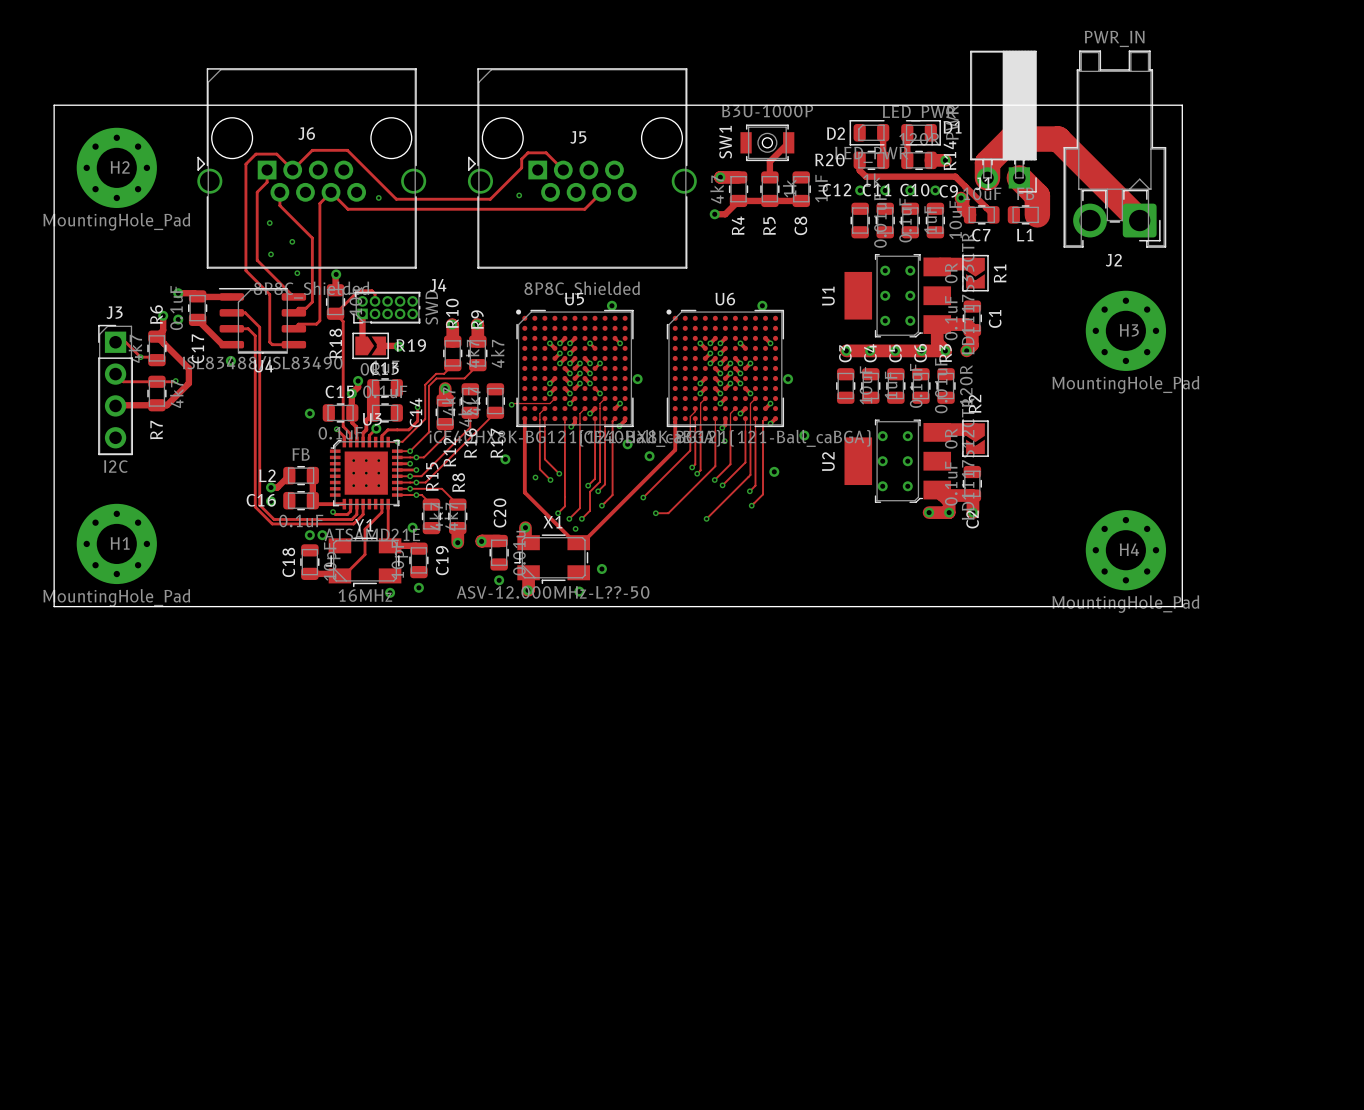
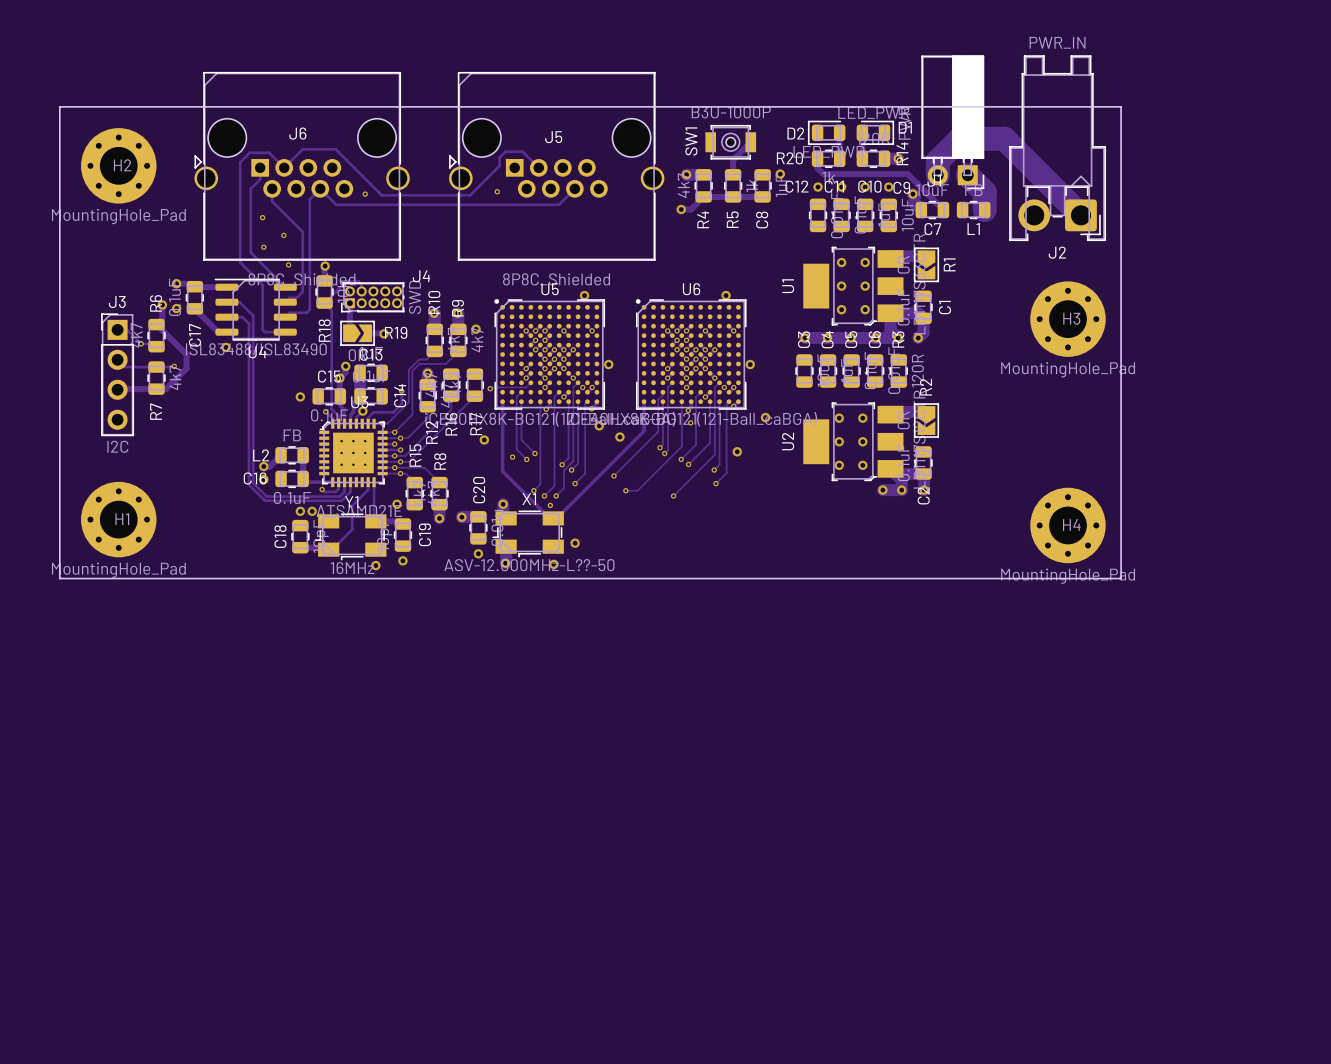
via: none -> (780, 174)
via: none -> (476, 329)
via: none -> (582, 387)
via: none -> (724, 387)

